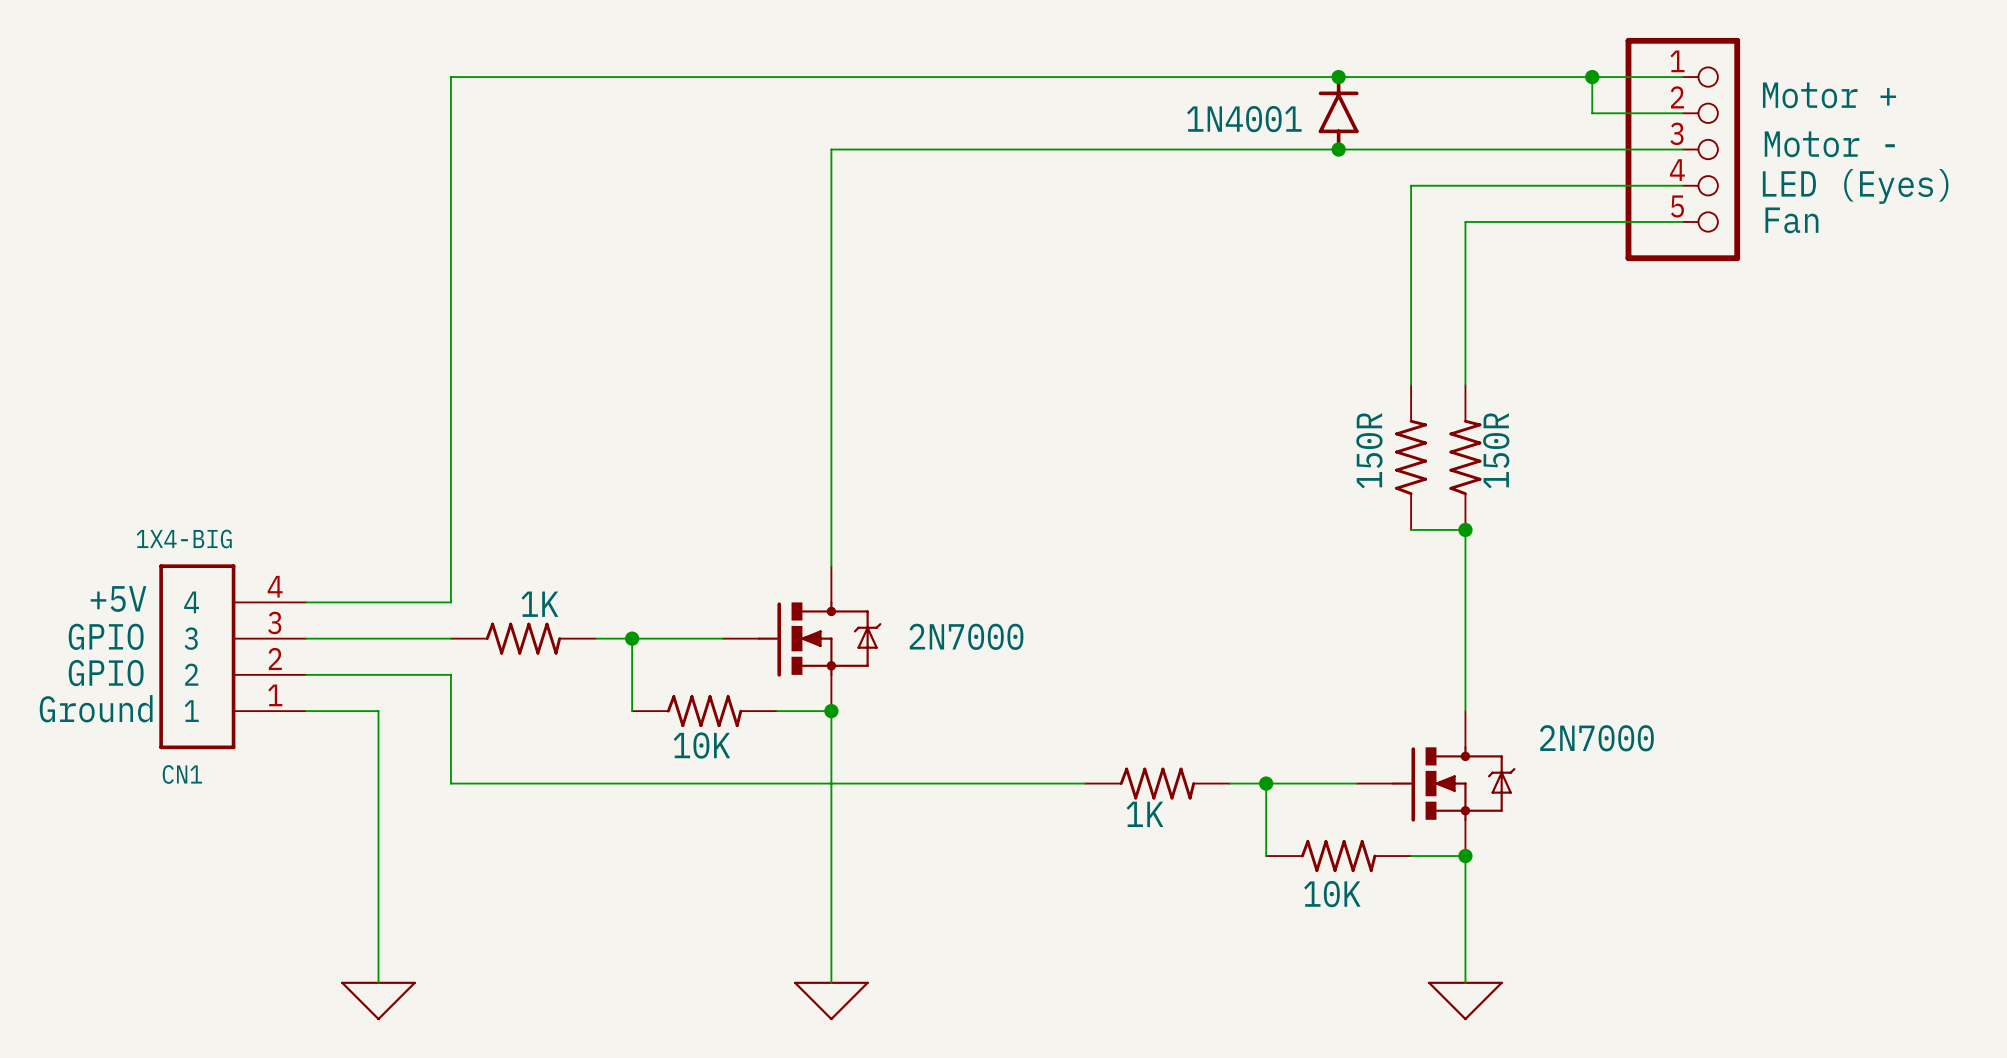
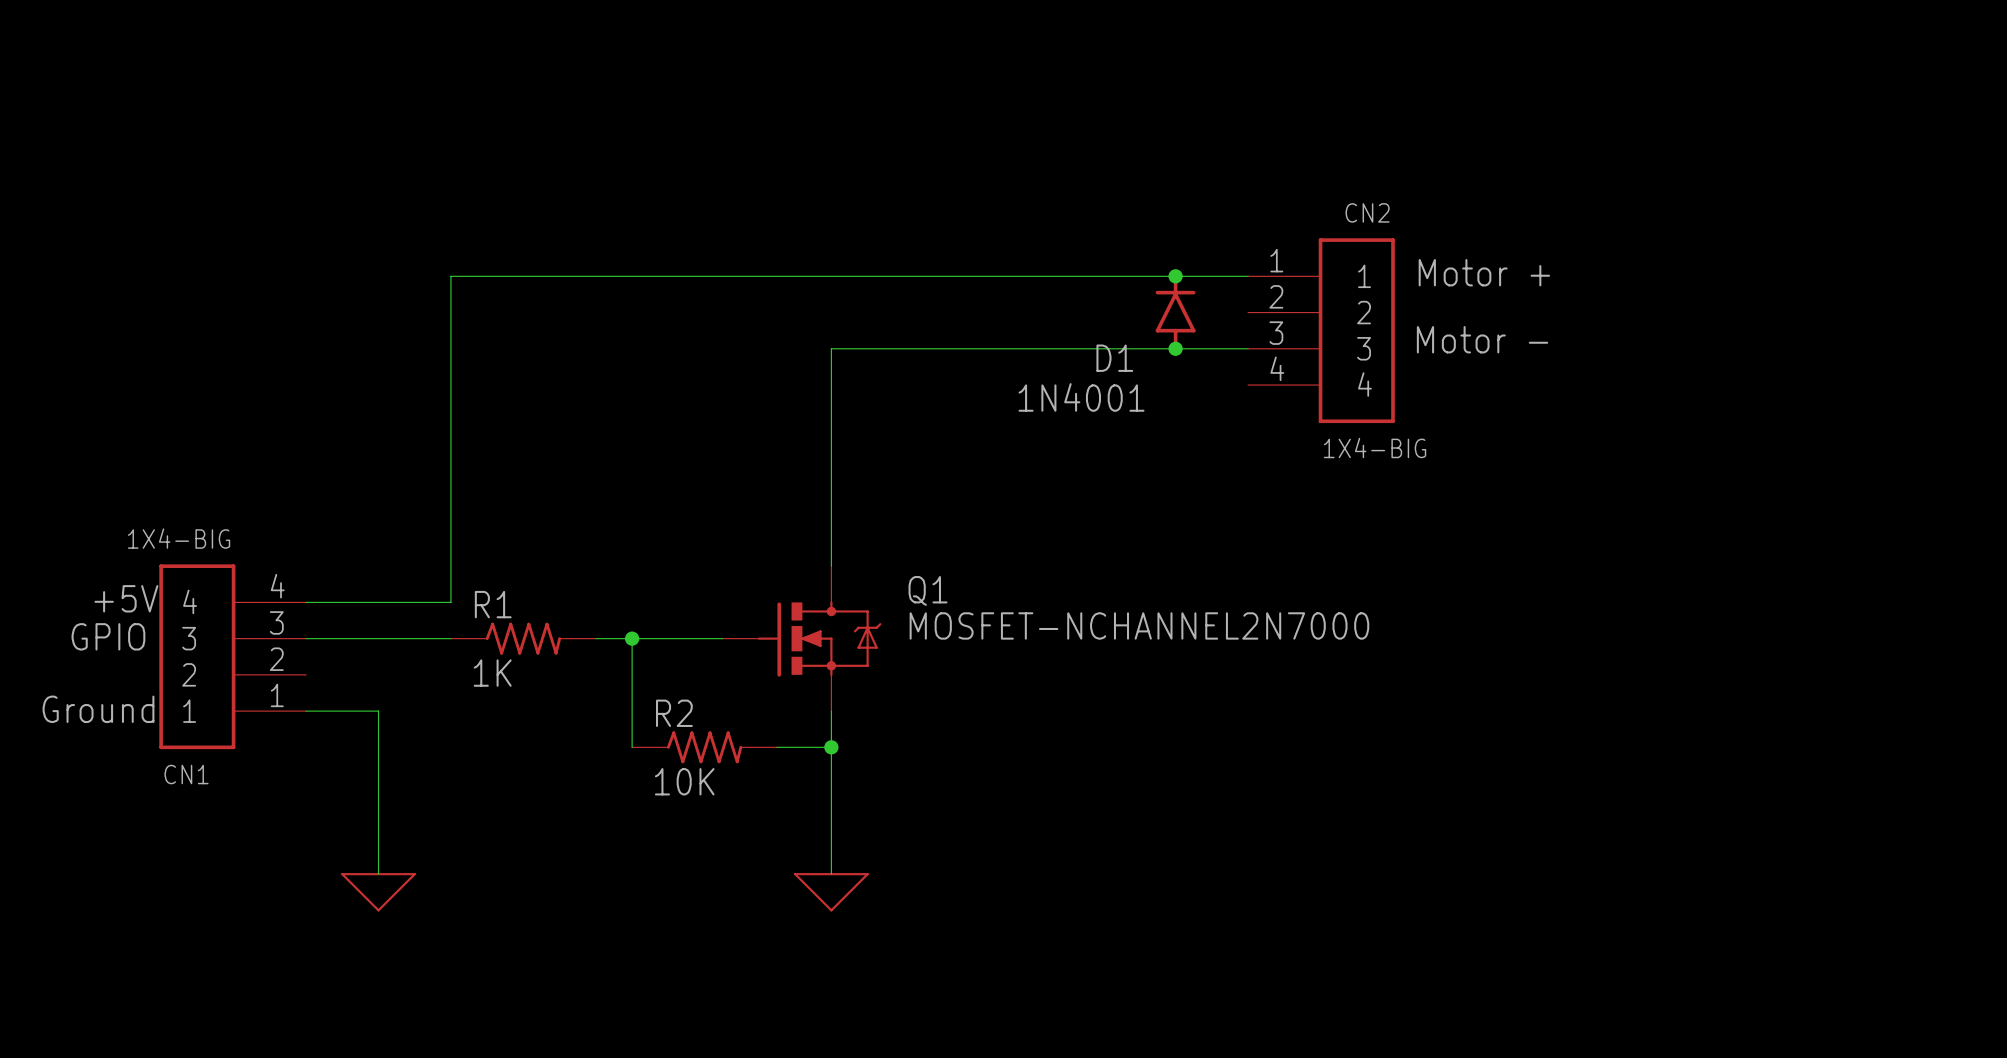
junction: (1338, 77) -> none
wire: (1592, 77) (1592, 113) (1682, 113) -> none
junction: (1592, 77) -> none
wire: (1682, 77) (450, 77) (450, 276) -> (1248, 276) (450, 276)
text: Motor + (1829, 95) -> none
part: 1N4001 (1338, 113) -> none
text: Motor - (1829, 144) -> none
junction: (1338, 149) -> none
wire: (1682, 149) (831, 149) (831, 348) -> (1248, 348) (831, 348)
part: (1682, 149) -> none
wire: (1682, 185) (1411, 185) (1411, 385) -> none
text: LED (Eyes) (1855, 186) -> none
text: Fan (1791, 220) -> none
wire: (1682, 221) (1465, 221) (1465, 385) -> none
text: none -> Motor + (1484, 272)
junction: none -> (1175, 276)
D1: none -> 1N4001 (1175, 312)
CN2: none -> 1X4-BIG (1321, 330)
text: none -> Motor - (1482, 339)
junction: none -> (1175, 348)
part: 150R (1411, 457) -> none
part: 150R (1465, 457) -> none
wire: (1411, 529) (1465, 529) (1465, 711) -> none
junction: (1465, 529) -> none
Q1 name: none -> Q1 (928, 590)
R1 name: none -> R1 (493, 604)
R1 value position: 1K (539, 604) -> 1K (492, 673)
Q1 value: none -> MOSFET-NCHANNEL2N7000 (1139, 625)
text: 2N7000 (966, 636) -> none
text: GPIO (106, 673) -> none
wire: (306, 674) (450, 674) (450, 783) (1085, 783) -> none
wire: none -> (632, 711) (632, 747)
part: 10K (704, 711) -> none
wire: (777, 711) (831, 711) -> (777, 747) (831, 747)
junction position: (831, 711) -> (831, 747)
text: 2N7000 (1596, 738) -> none
R2: none -> 10K (704, 747)
part: 1K (1157, 783) -> none
wire: (1229, 783) (1356, 783) -> none
wire: (1266, 783) (1266, 856) -> none
junction: (1266, 783) -> none
part: (1436, 783) -> none
part: 10K (1338, 856) -> none
wire: (1411, 856) (1465, 856) (1465, 982) -> none
junction: (1465, 856) -> none
wire: (378, 874) (378, 982) -> none
wire: (831, 874) (831, 982) -> none
power symbol position: (378, 1000) -> (378, 892)
power symbol position: (831, 1000) -> (831, 892)
power symbol: (1465, 1000) -> none

